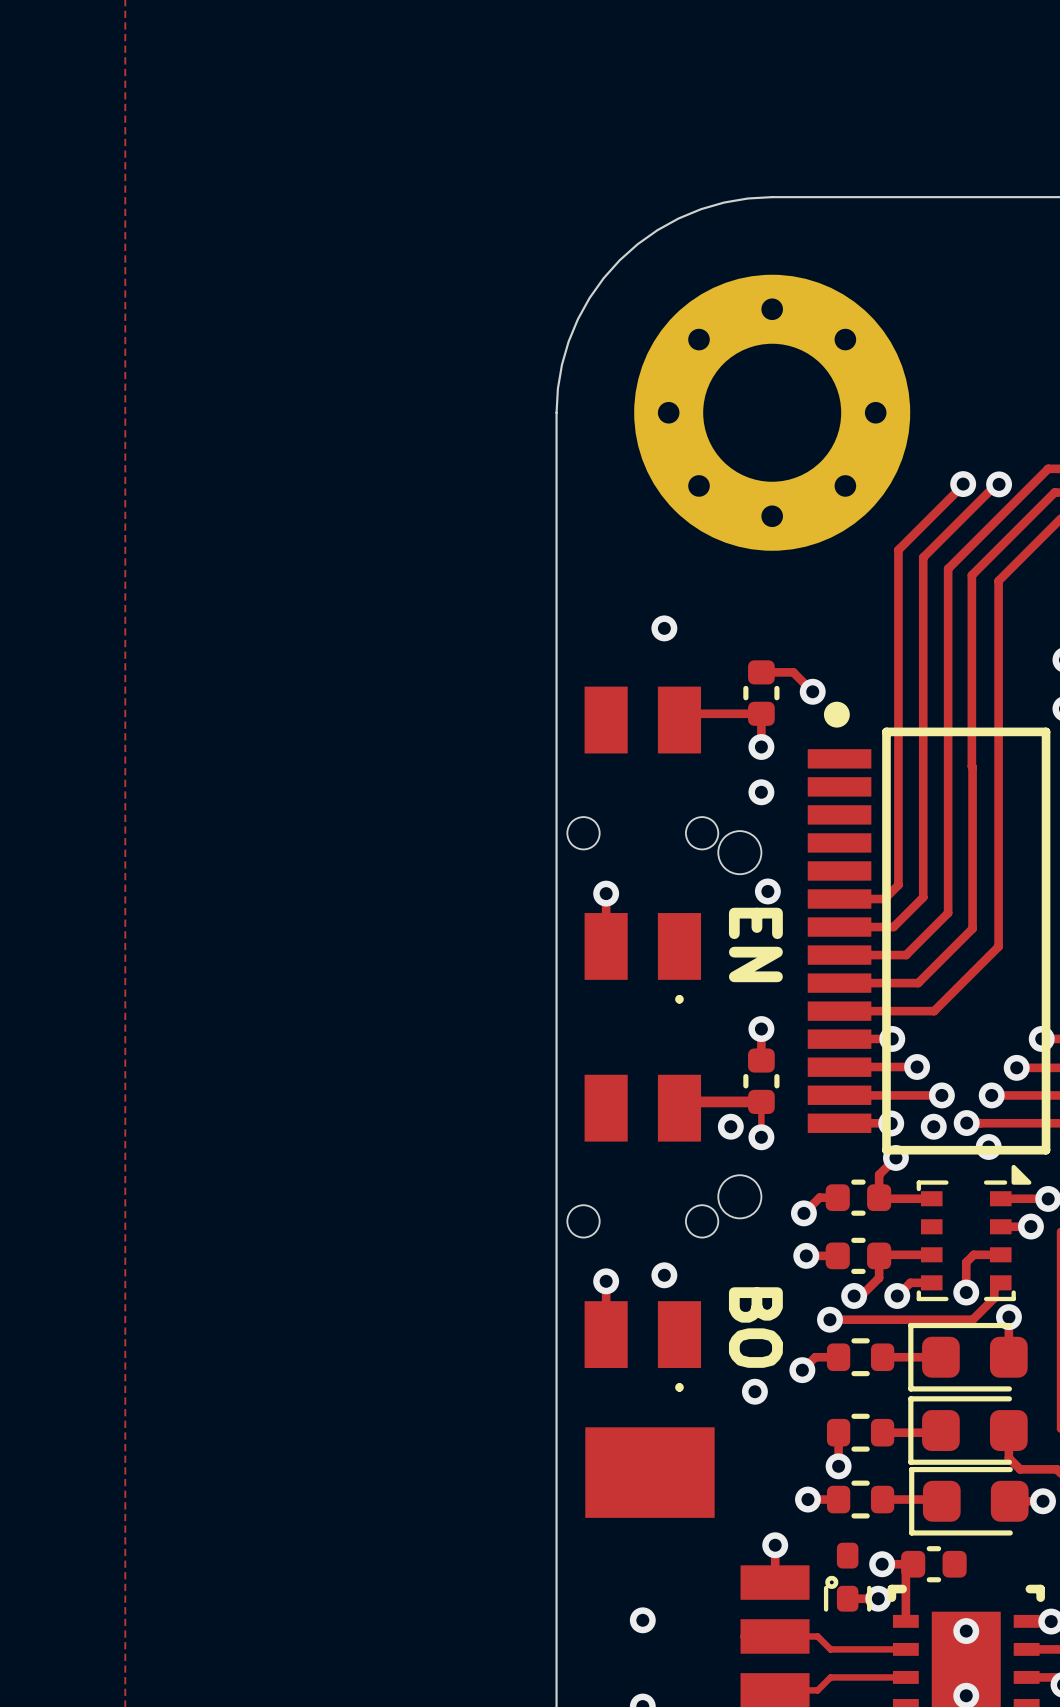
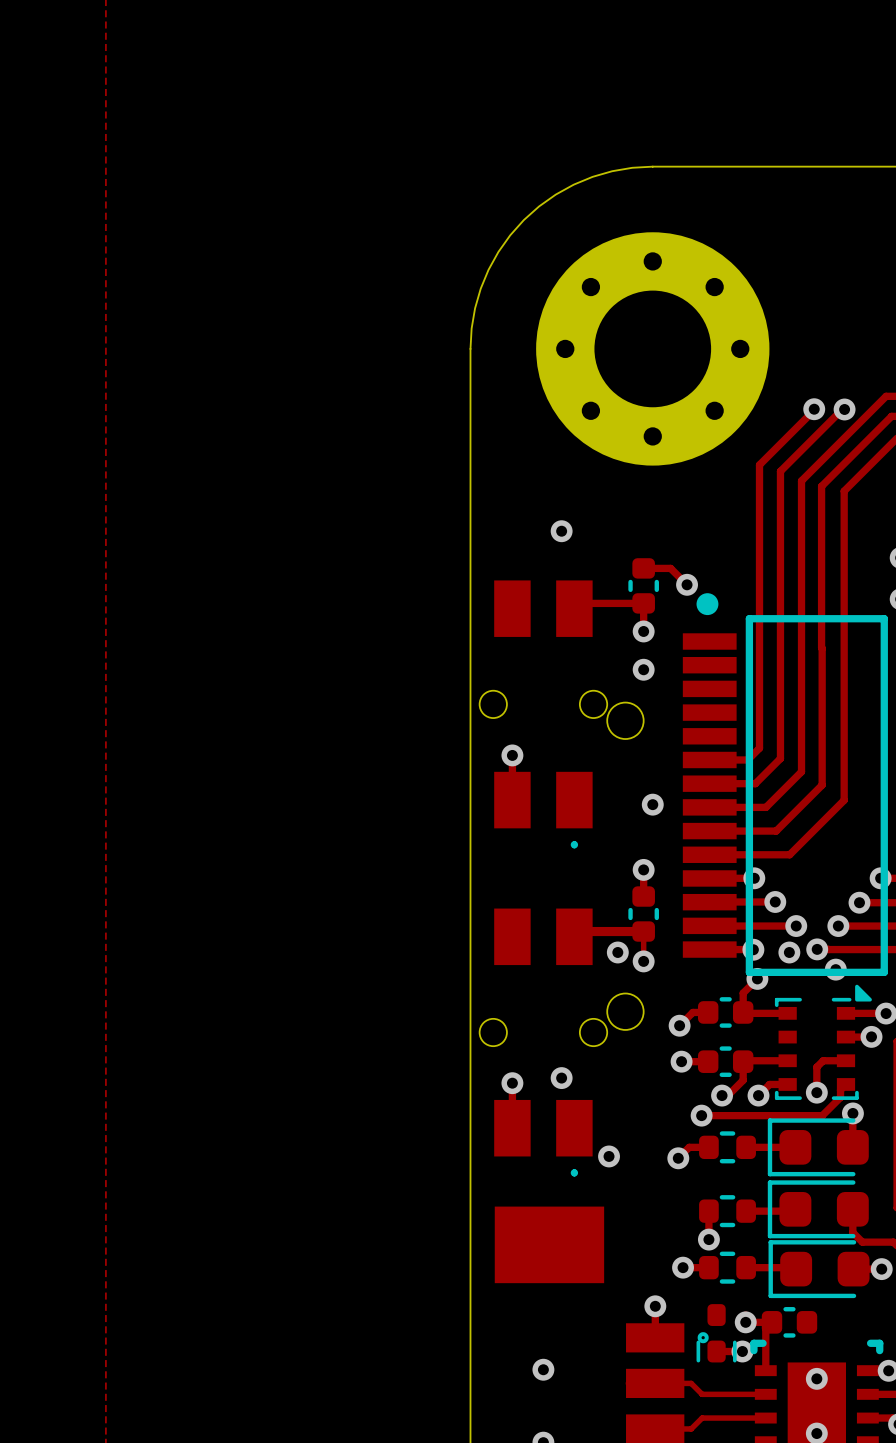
via position: (767, 891) -> (652, 804)
text: EN (755, 944) -> none
text: BO (755, 1327) -> none
via position: (754, 1391) -> (609, 1156)

